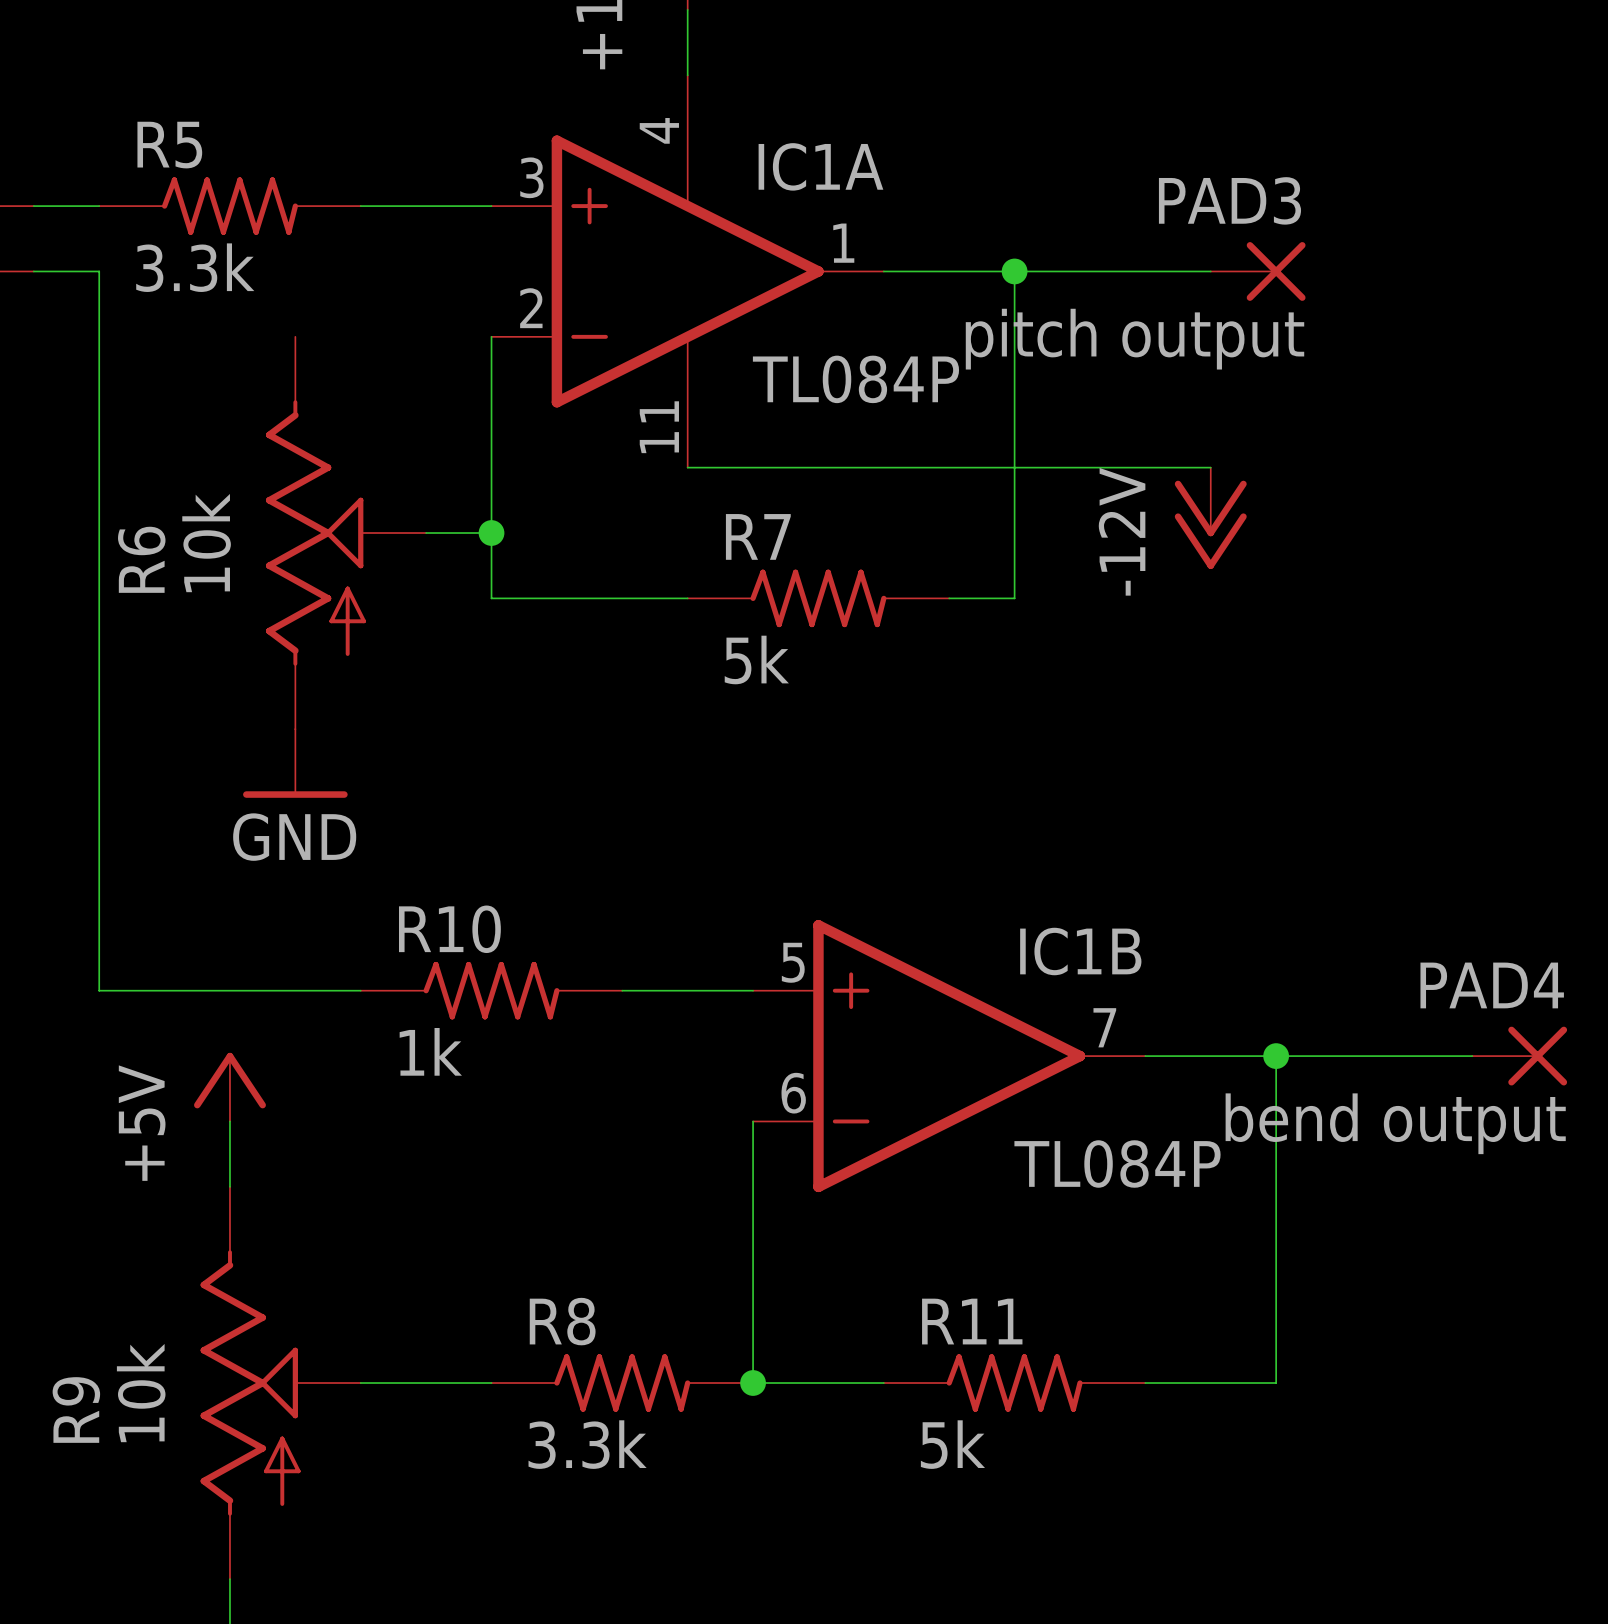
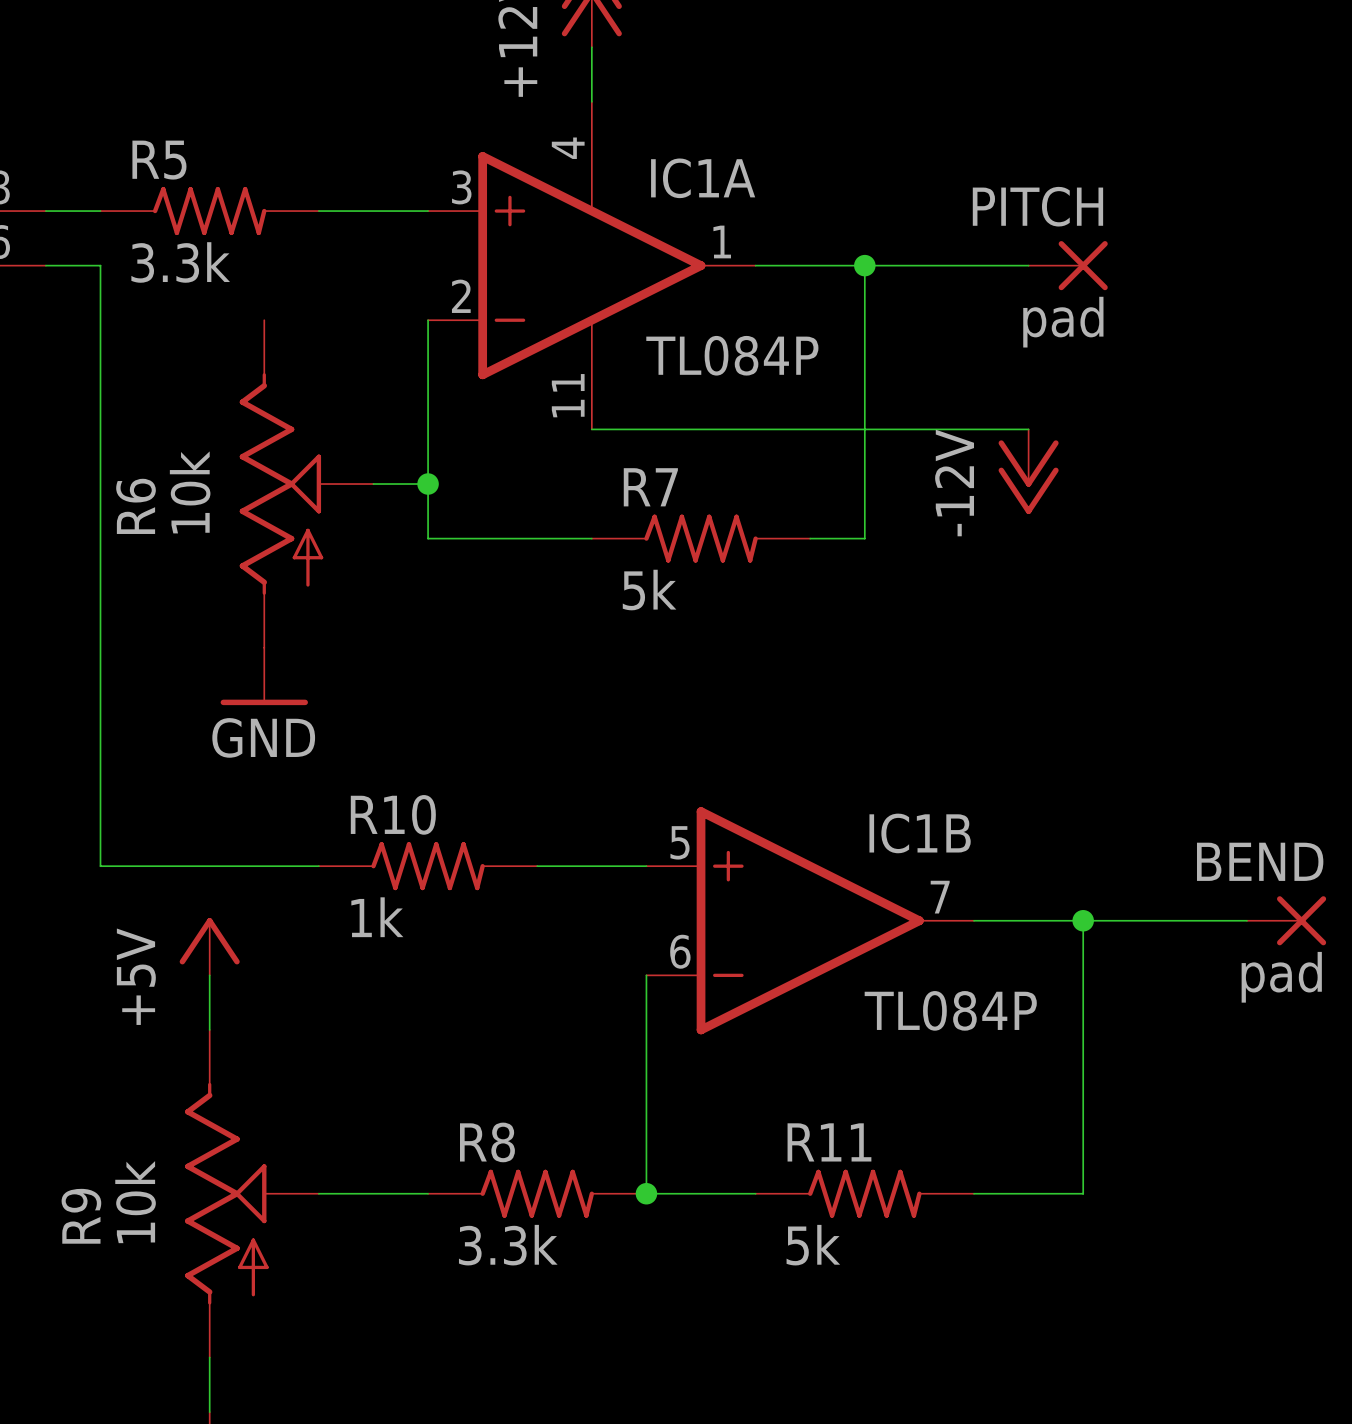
PAD3 name: PAD3 (1229, 200) -> PITCH (1037, 206)
PAD3 value: pitch output (1134, 339) -> pad (1063, 322)
PAD4 name: PAD4 (1492, 985) -> BEND (1260, 861)
PAD4 value: bend output (1395, 1123) -> pad (1281, 977)

